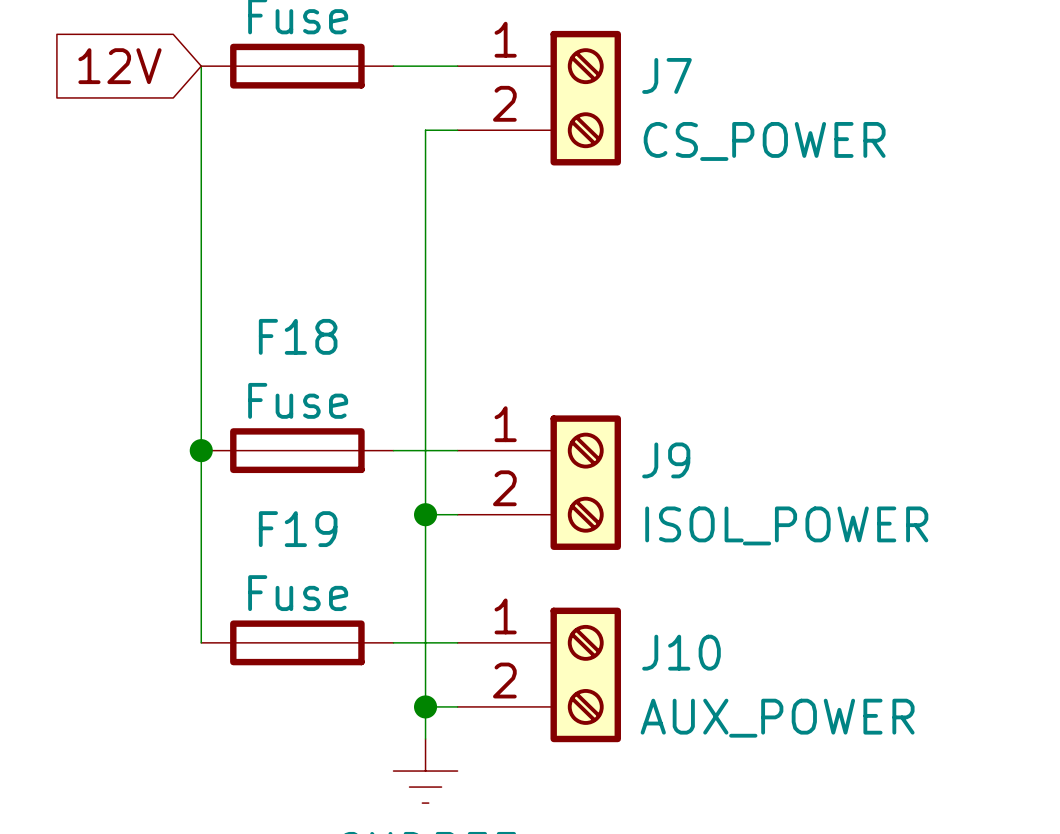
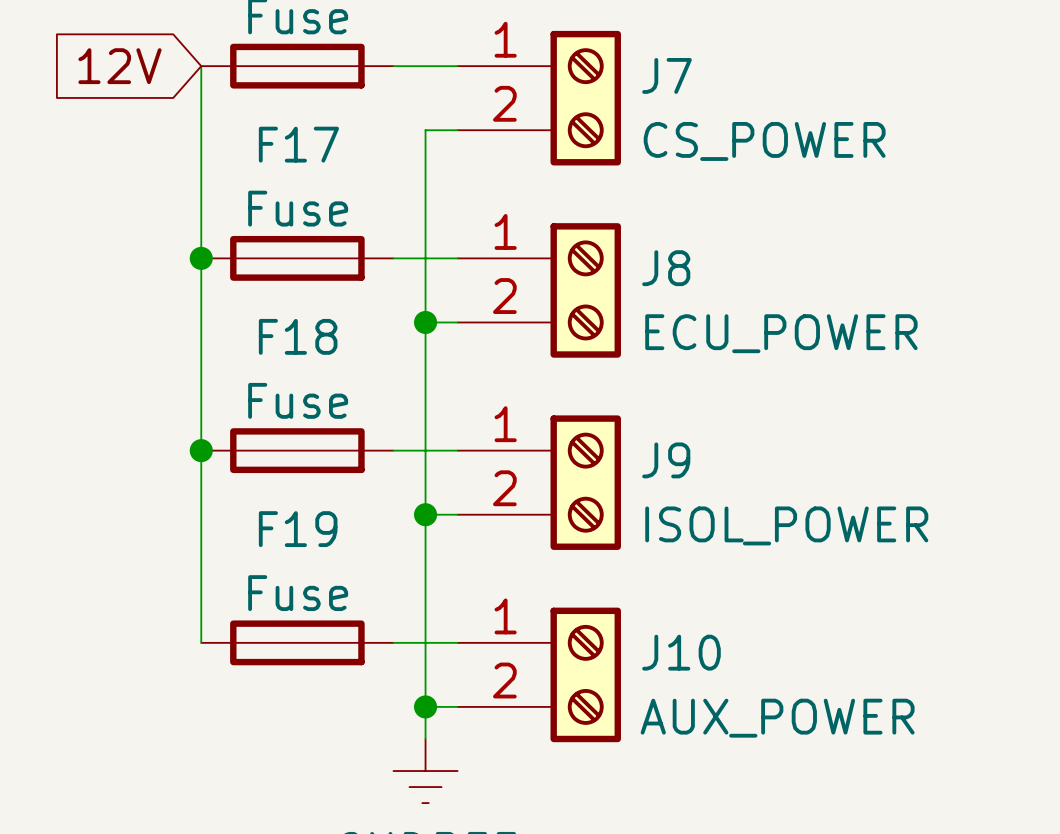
junction: none -> (201, 258)
F17: none -> Fuse (297, 258)
wire: none -> (393, 258) (457, 258)
J8: none -> ECU_POWER (539, 290)
wire: none -> (425, 322) (457, 322)
junction: none -> (425, 322)

